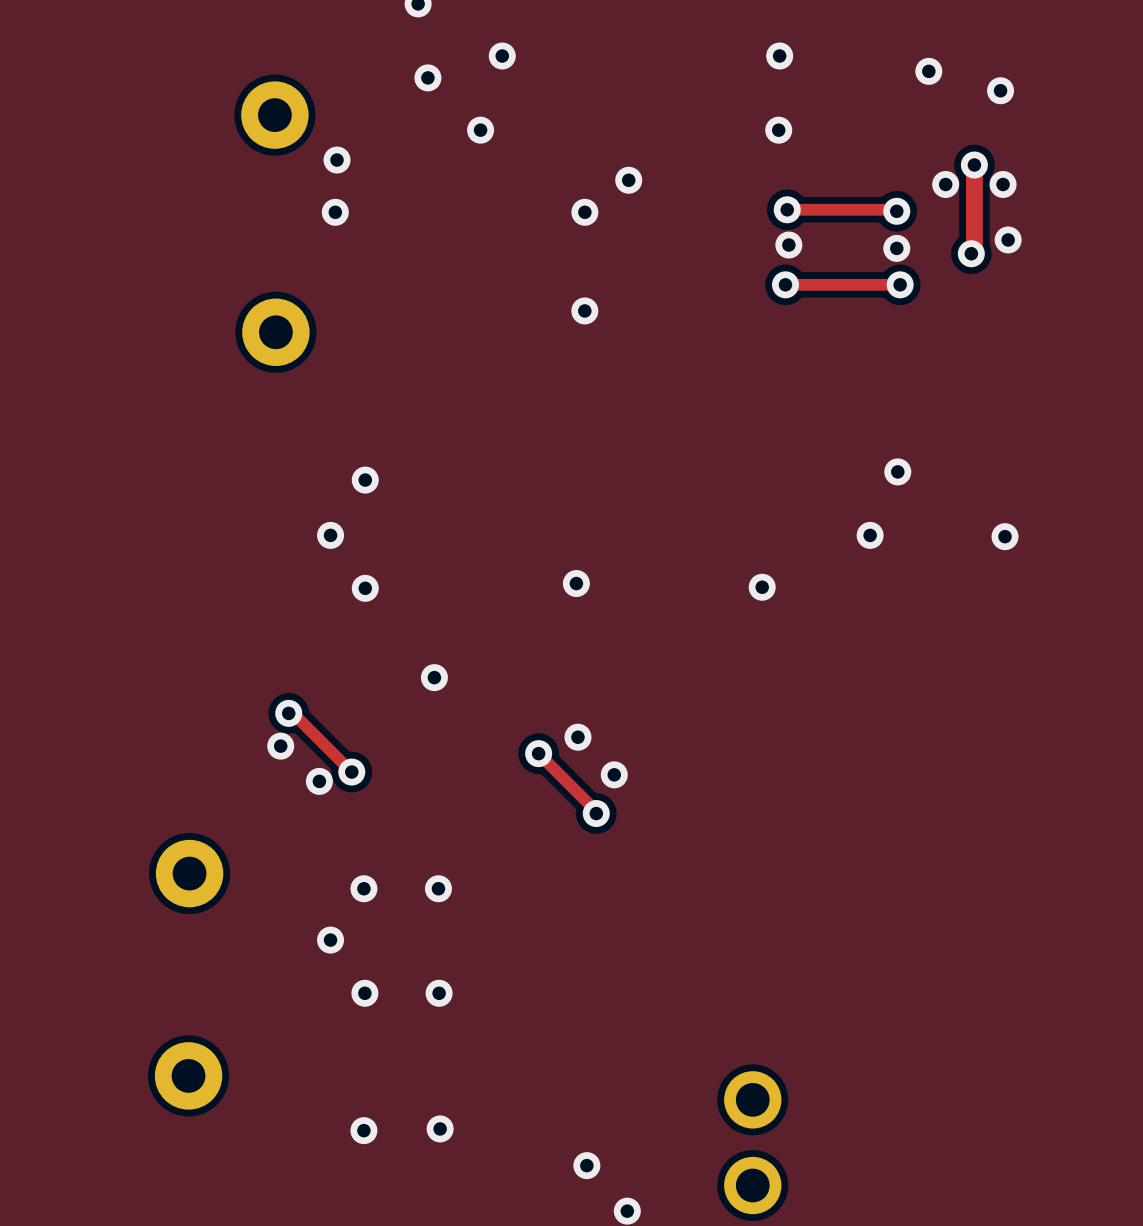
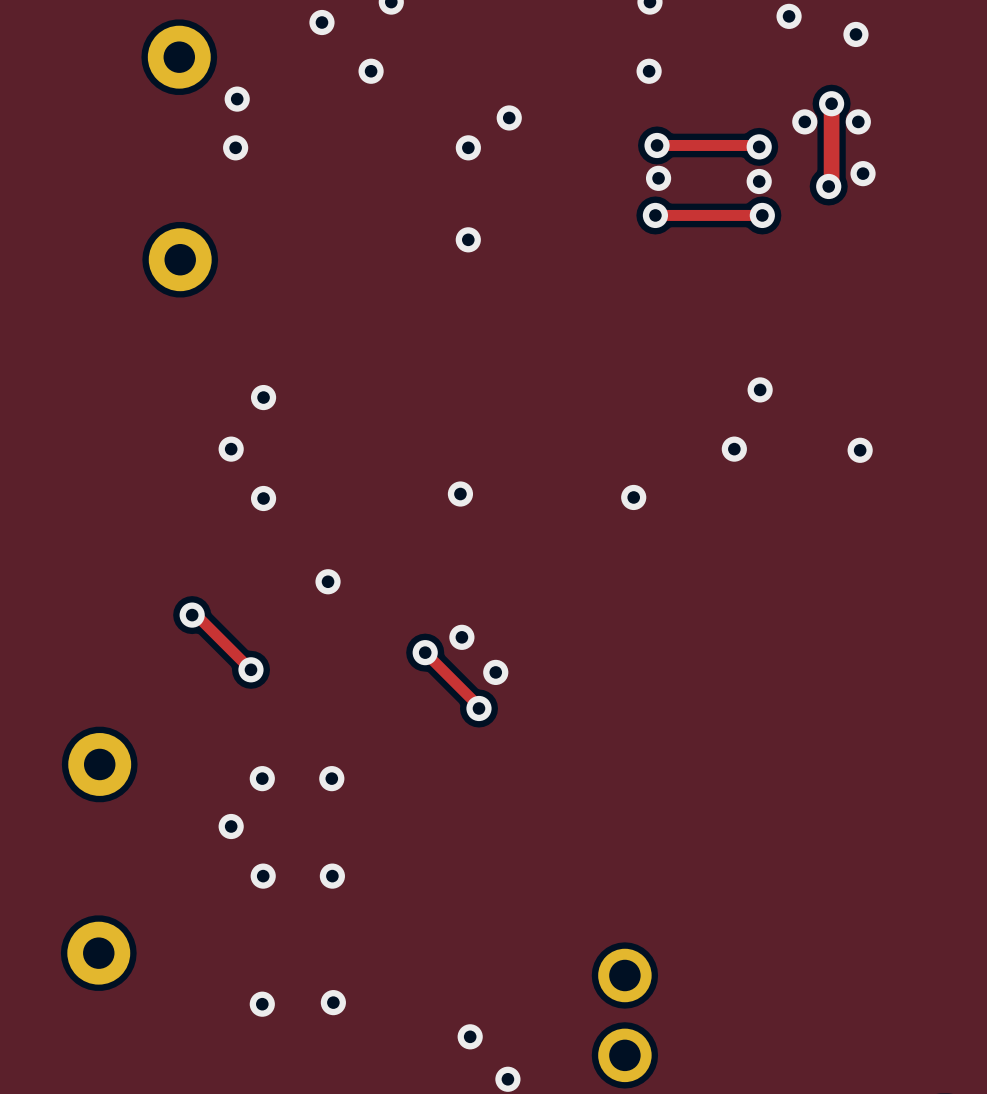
via: (280, 746) -> none
via: (319, 781) -> none

